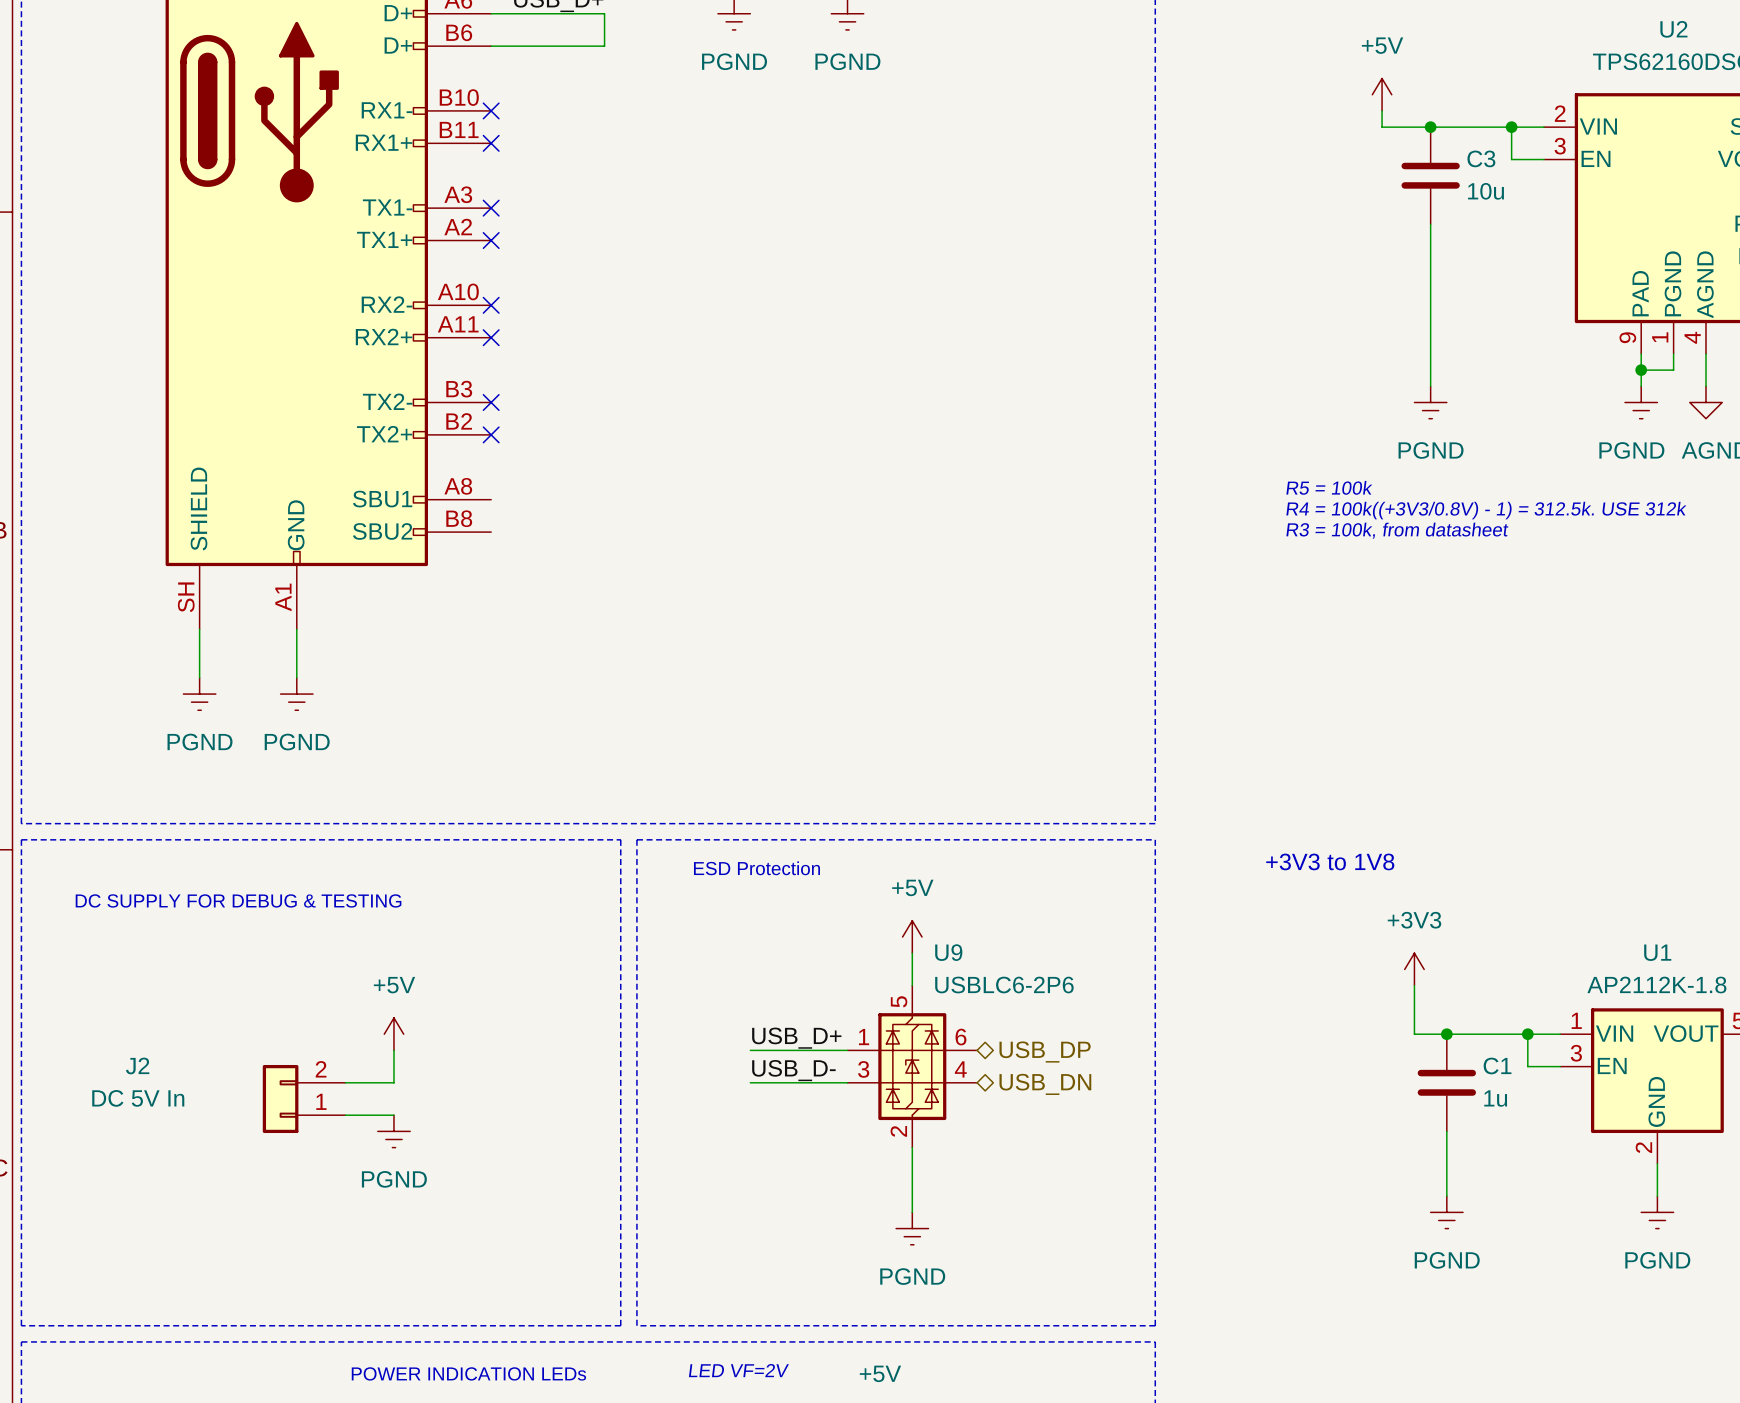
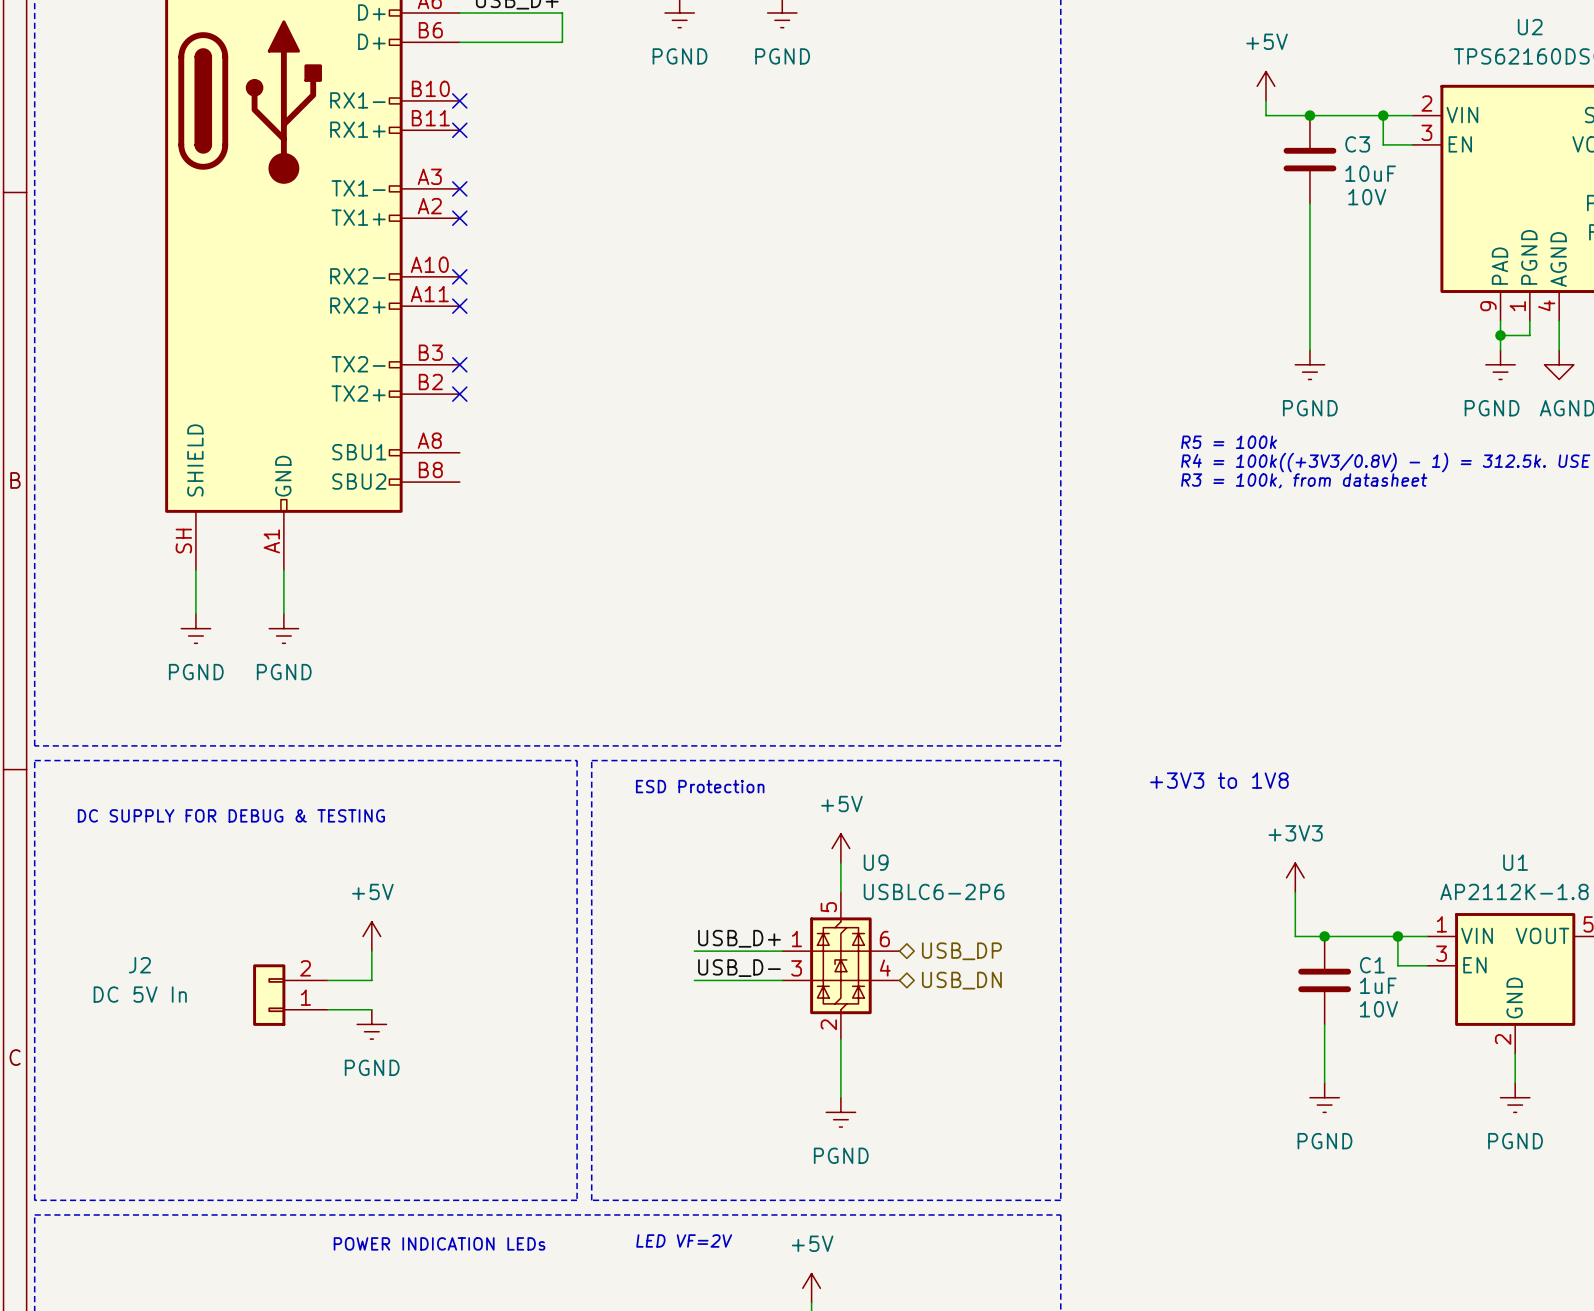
C3 value: 10u (1486, 191) -> 10uF (1370, 173)
C3 text: none -> 10V (1367, 197)
C1 value: 1u (1495, 1098) -> 1uF (1378, 985)
C1 text: none -> 10V (1378, 1009)

